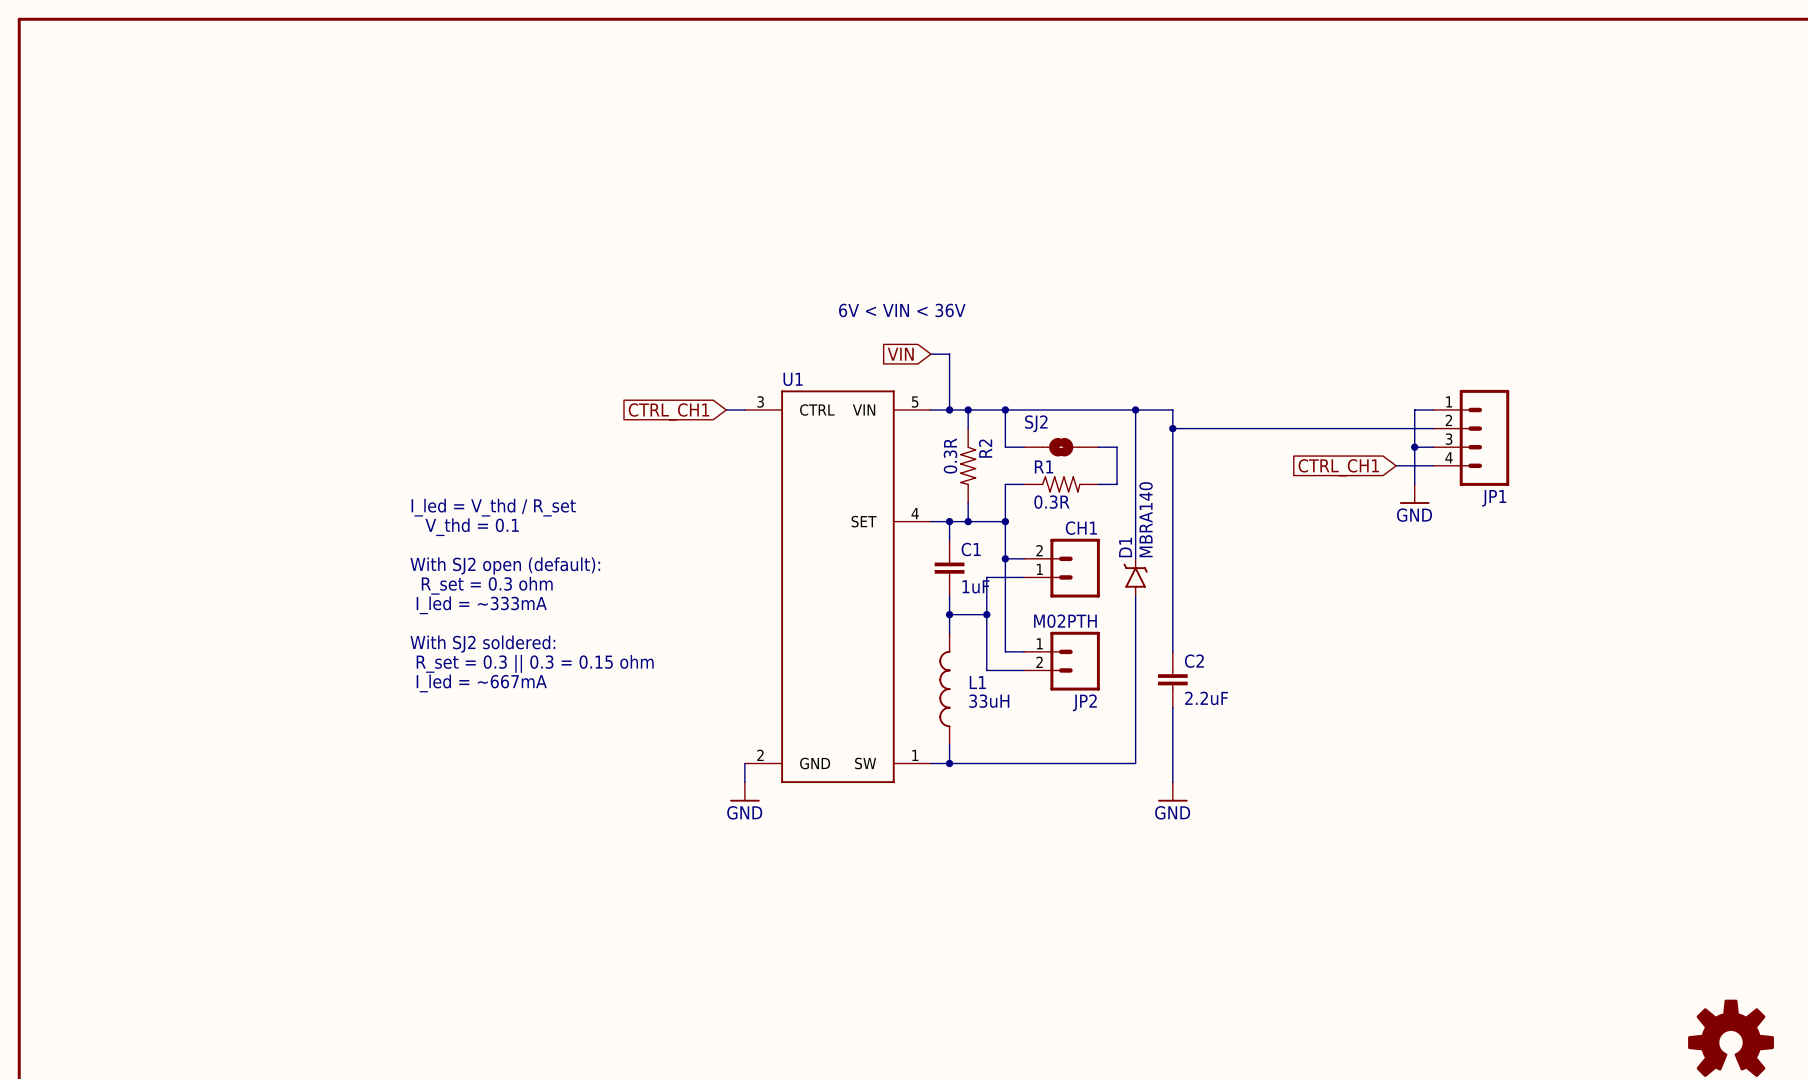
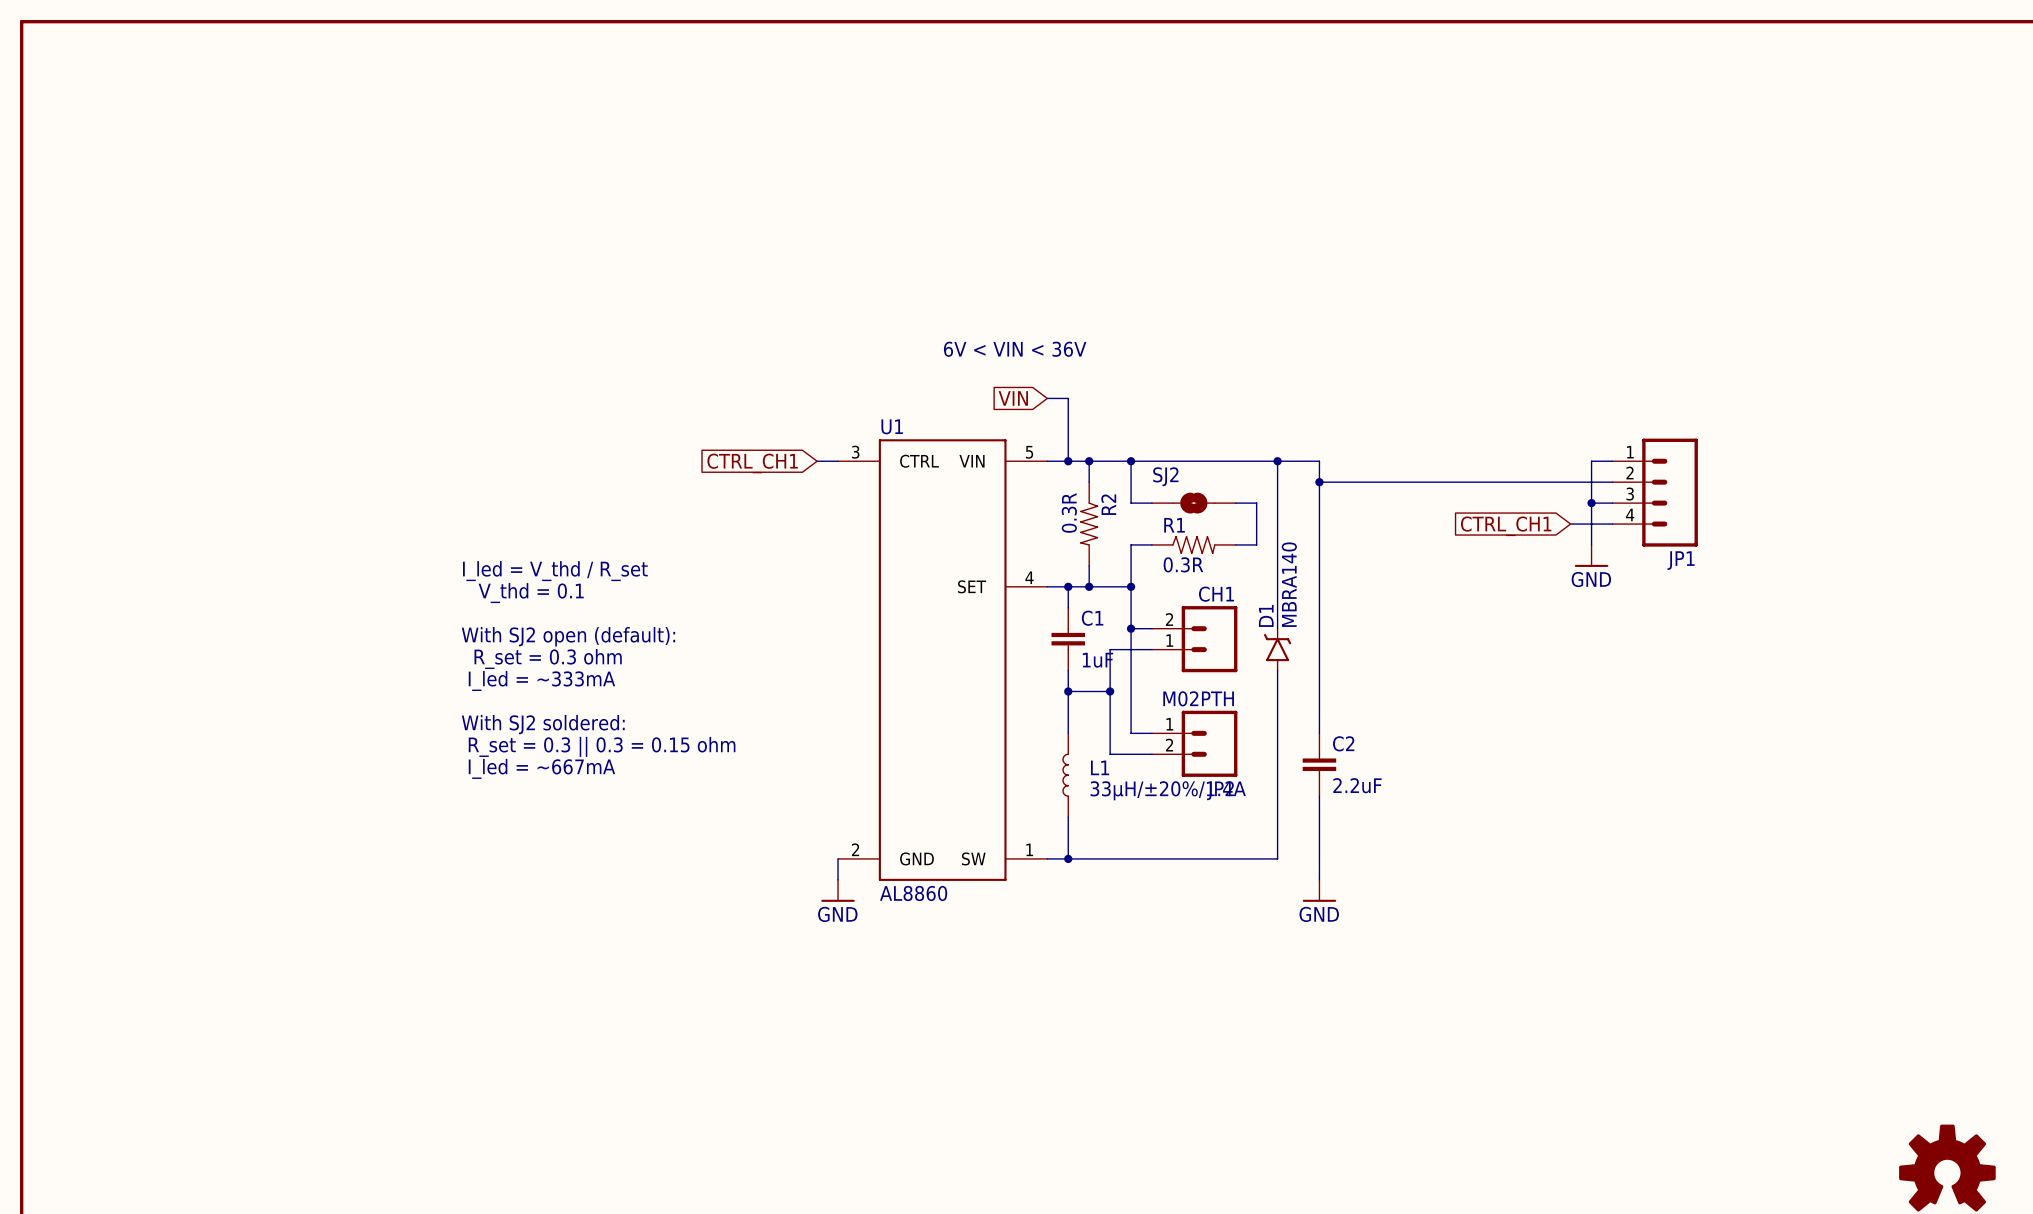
L1 symbol: [939, 633, 951, 745] -> [1062, 733, 1069, 818]
L1 value: 33uH (989, 701) -> 33µH/±20%/1.4A (1168, 790)
U1 value: none -> AL8860 (913, 893)

